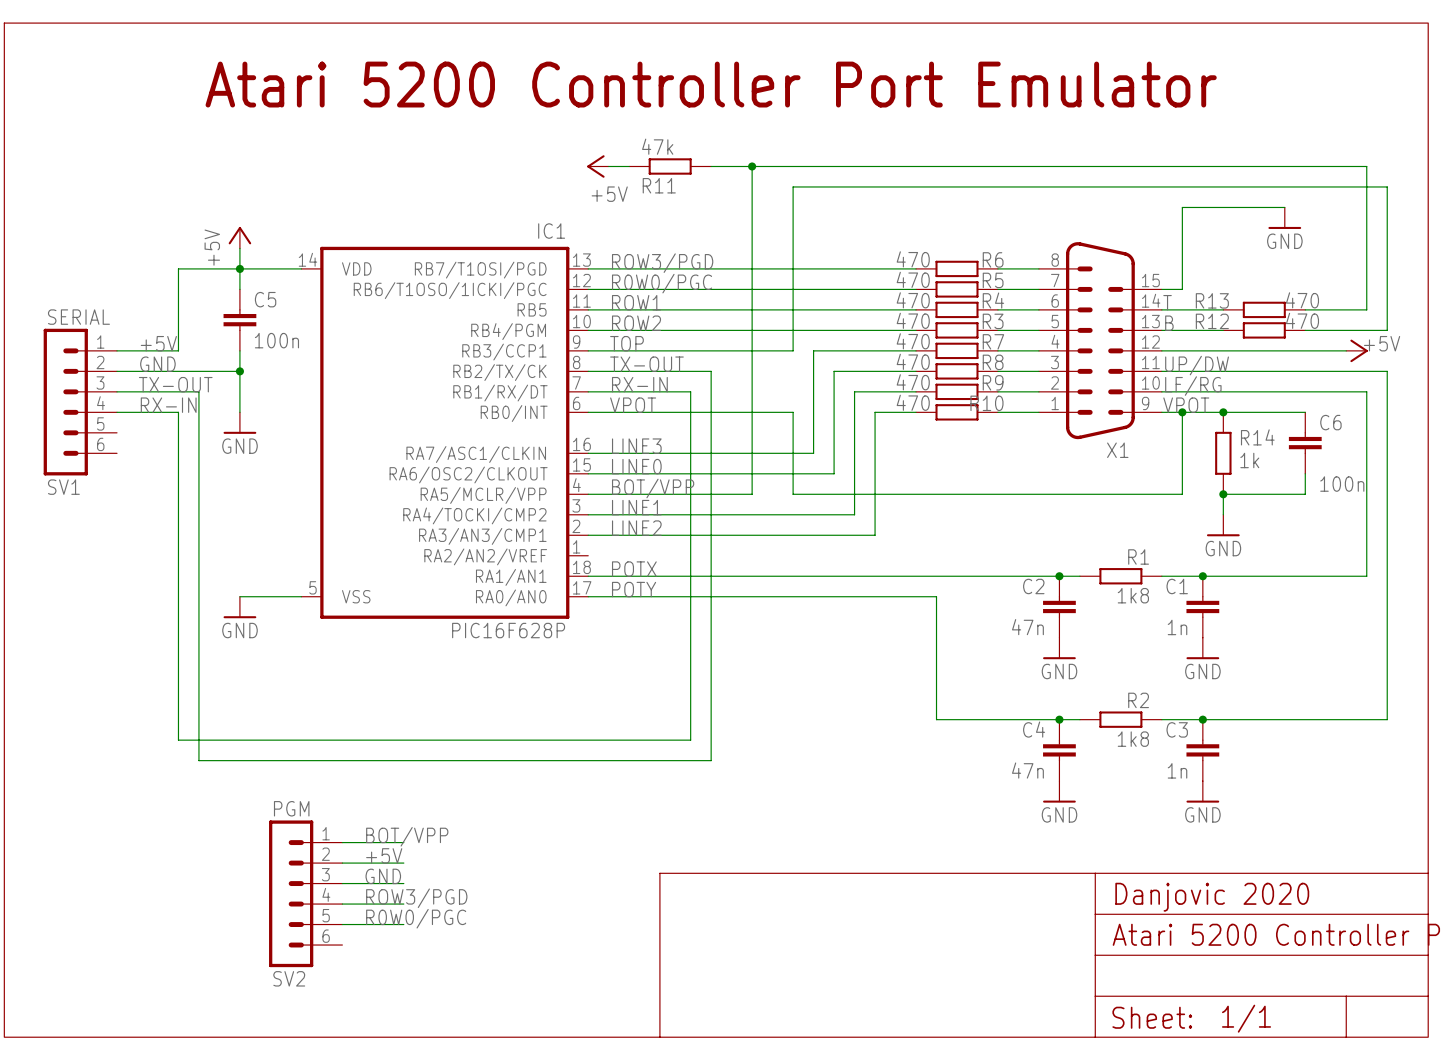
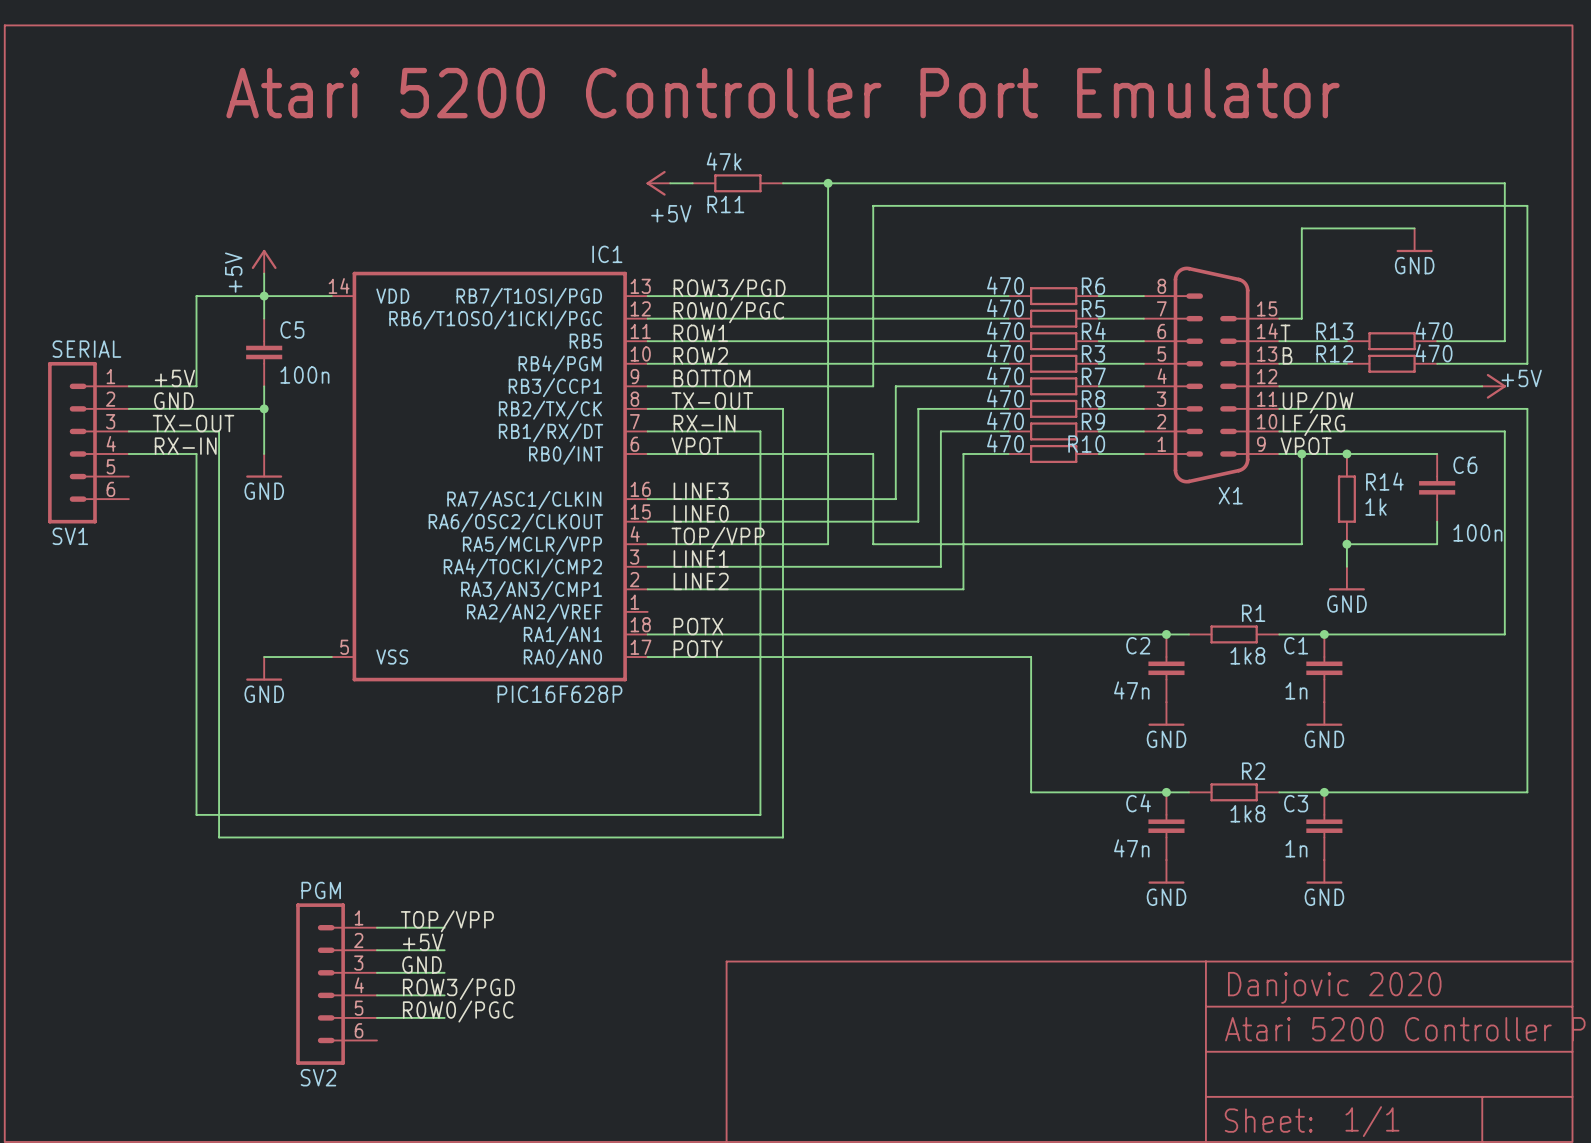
label: TOP (626, 343) -> BOTTOM (711, 378)
label: BOT/VPP (653, 488) -> TOP/VPP (718, 537)
label: BOT/VPP (407, 836) -> TOP/VPP (447, 921)

